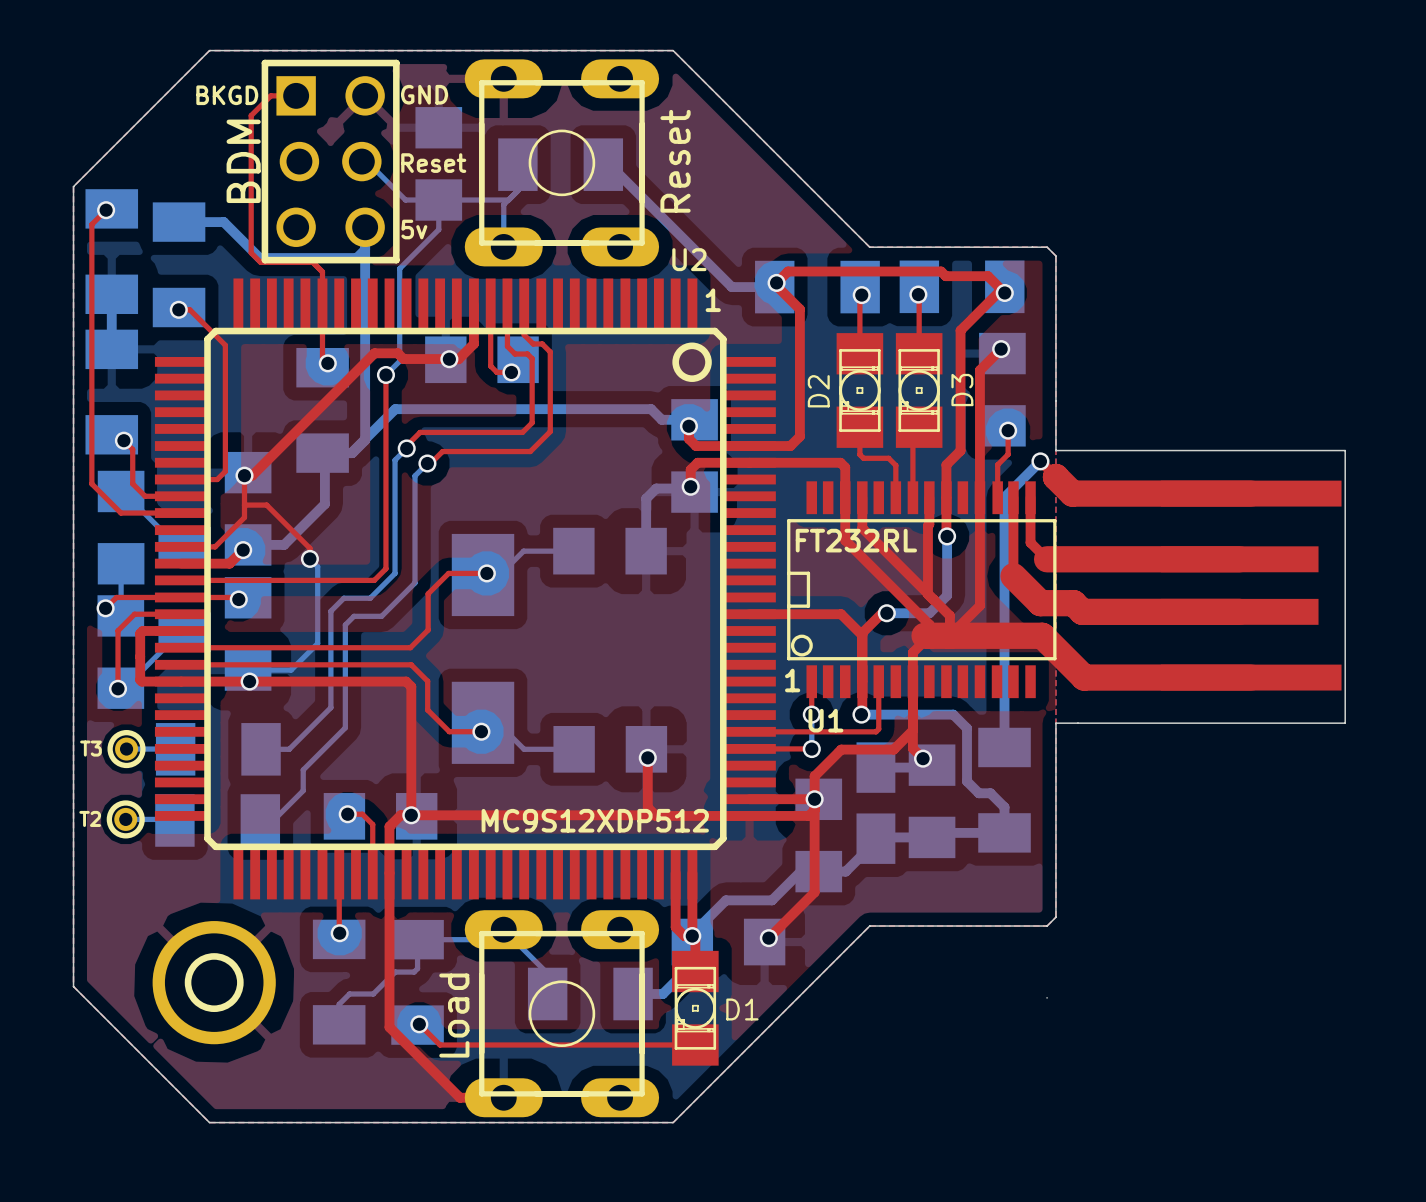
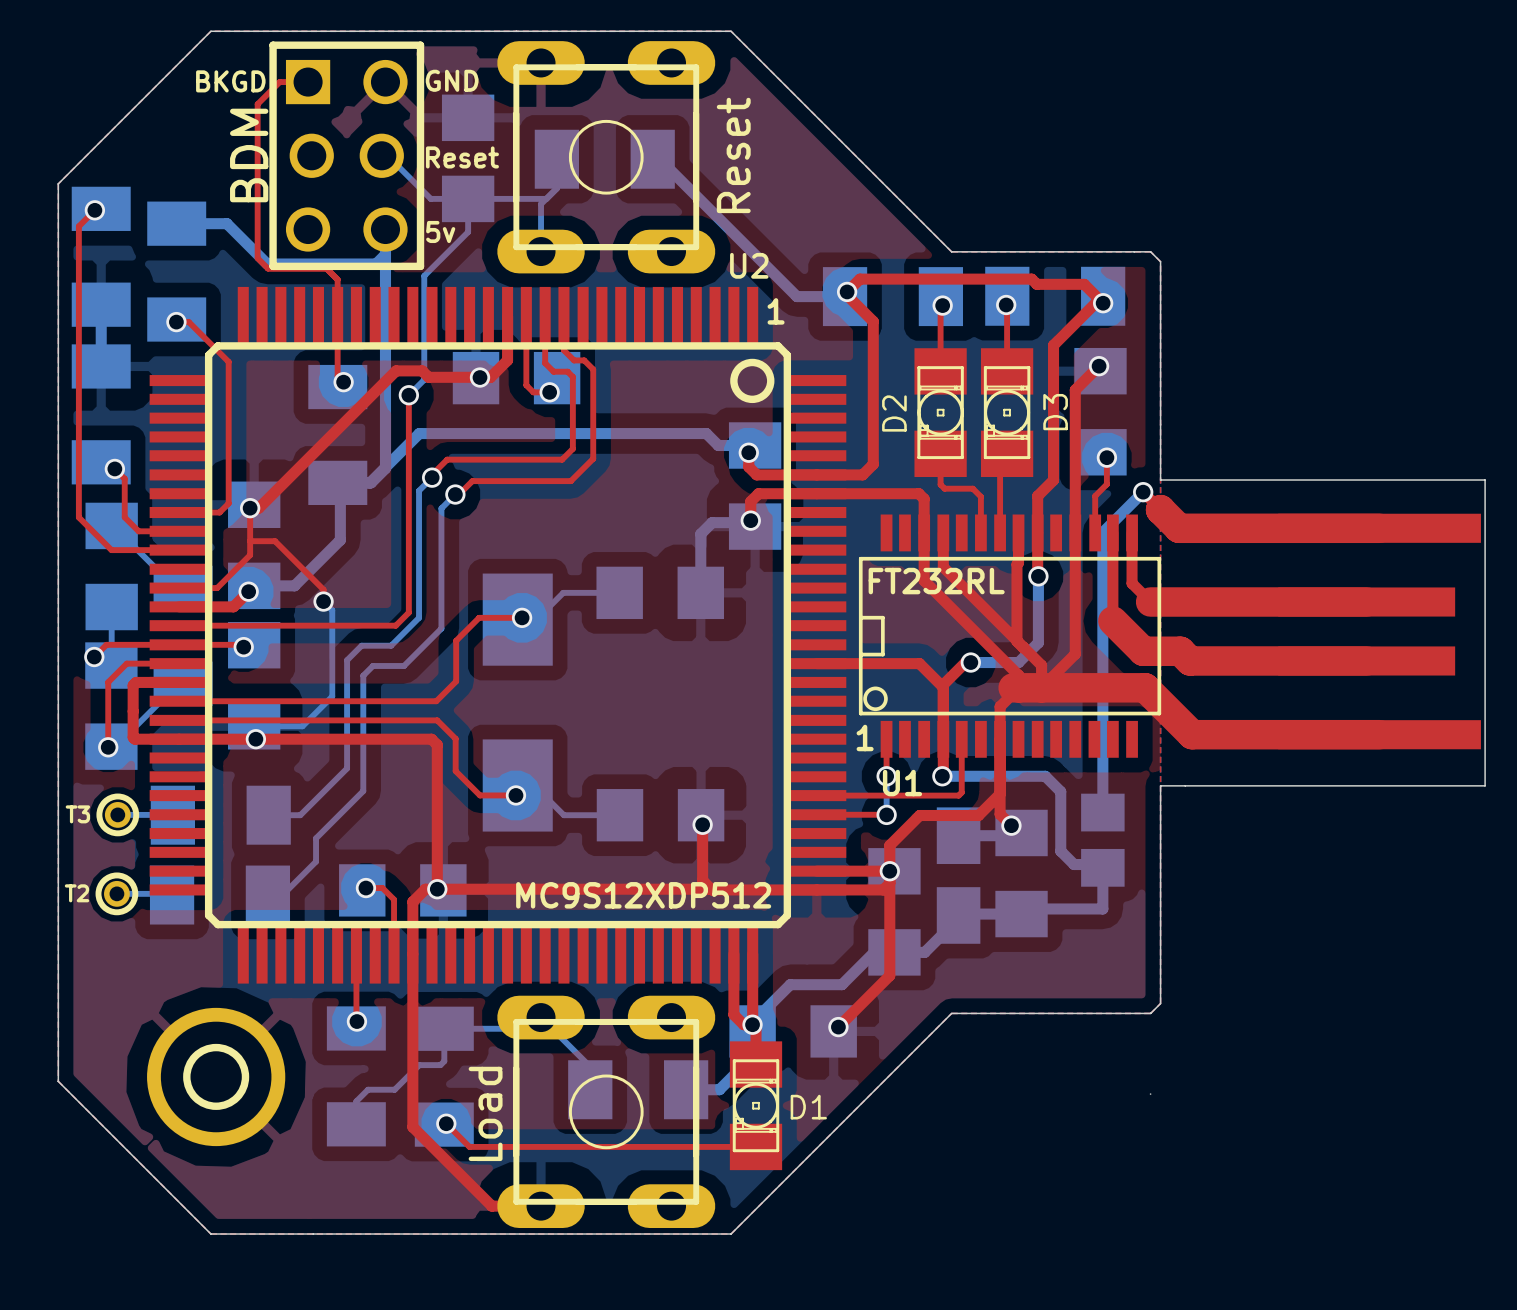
part footprint: [978, 727, 1031, 853] -> [1081, 793, 1125, 887]

